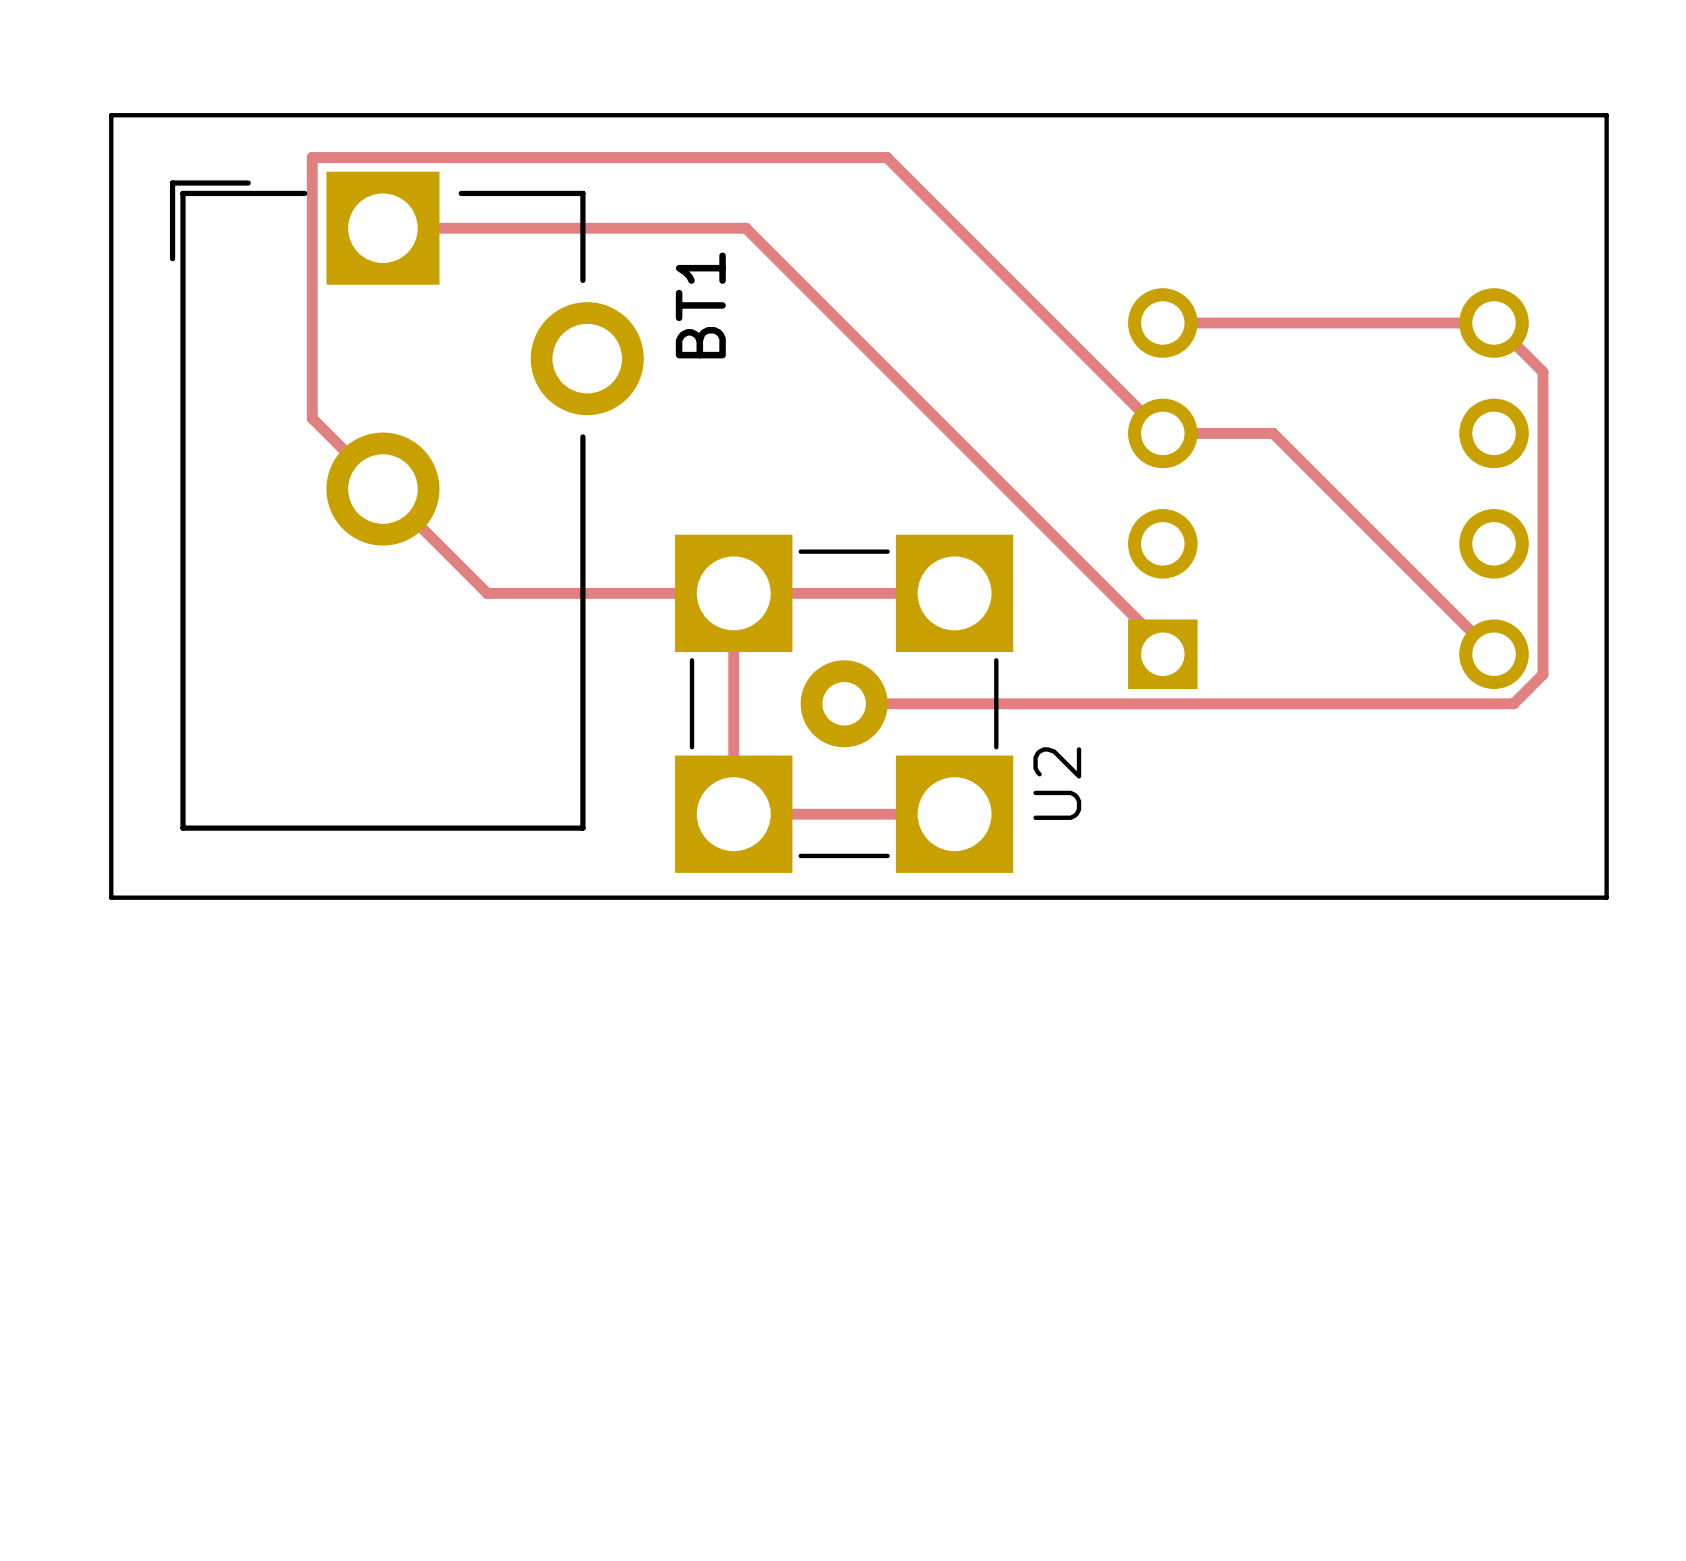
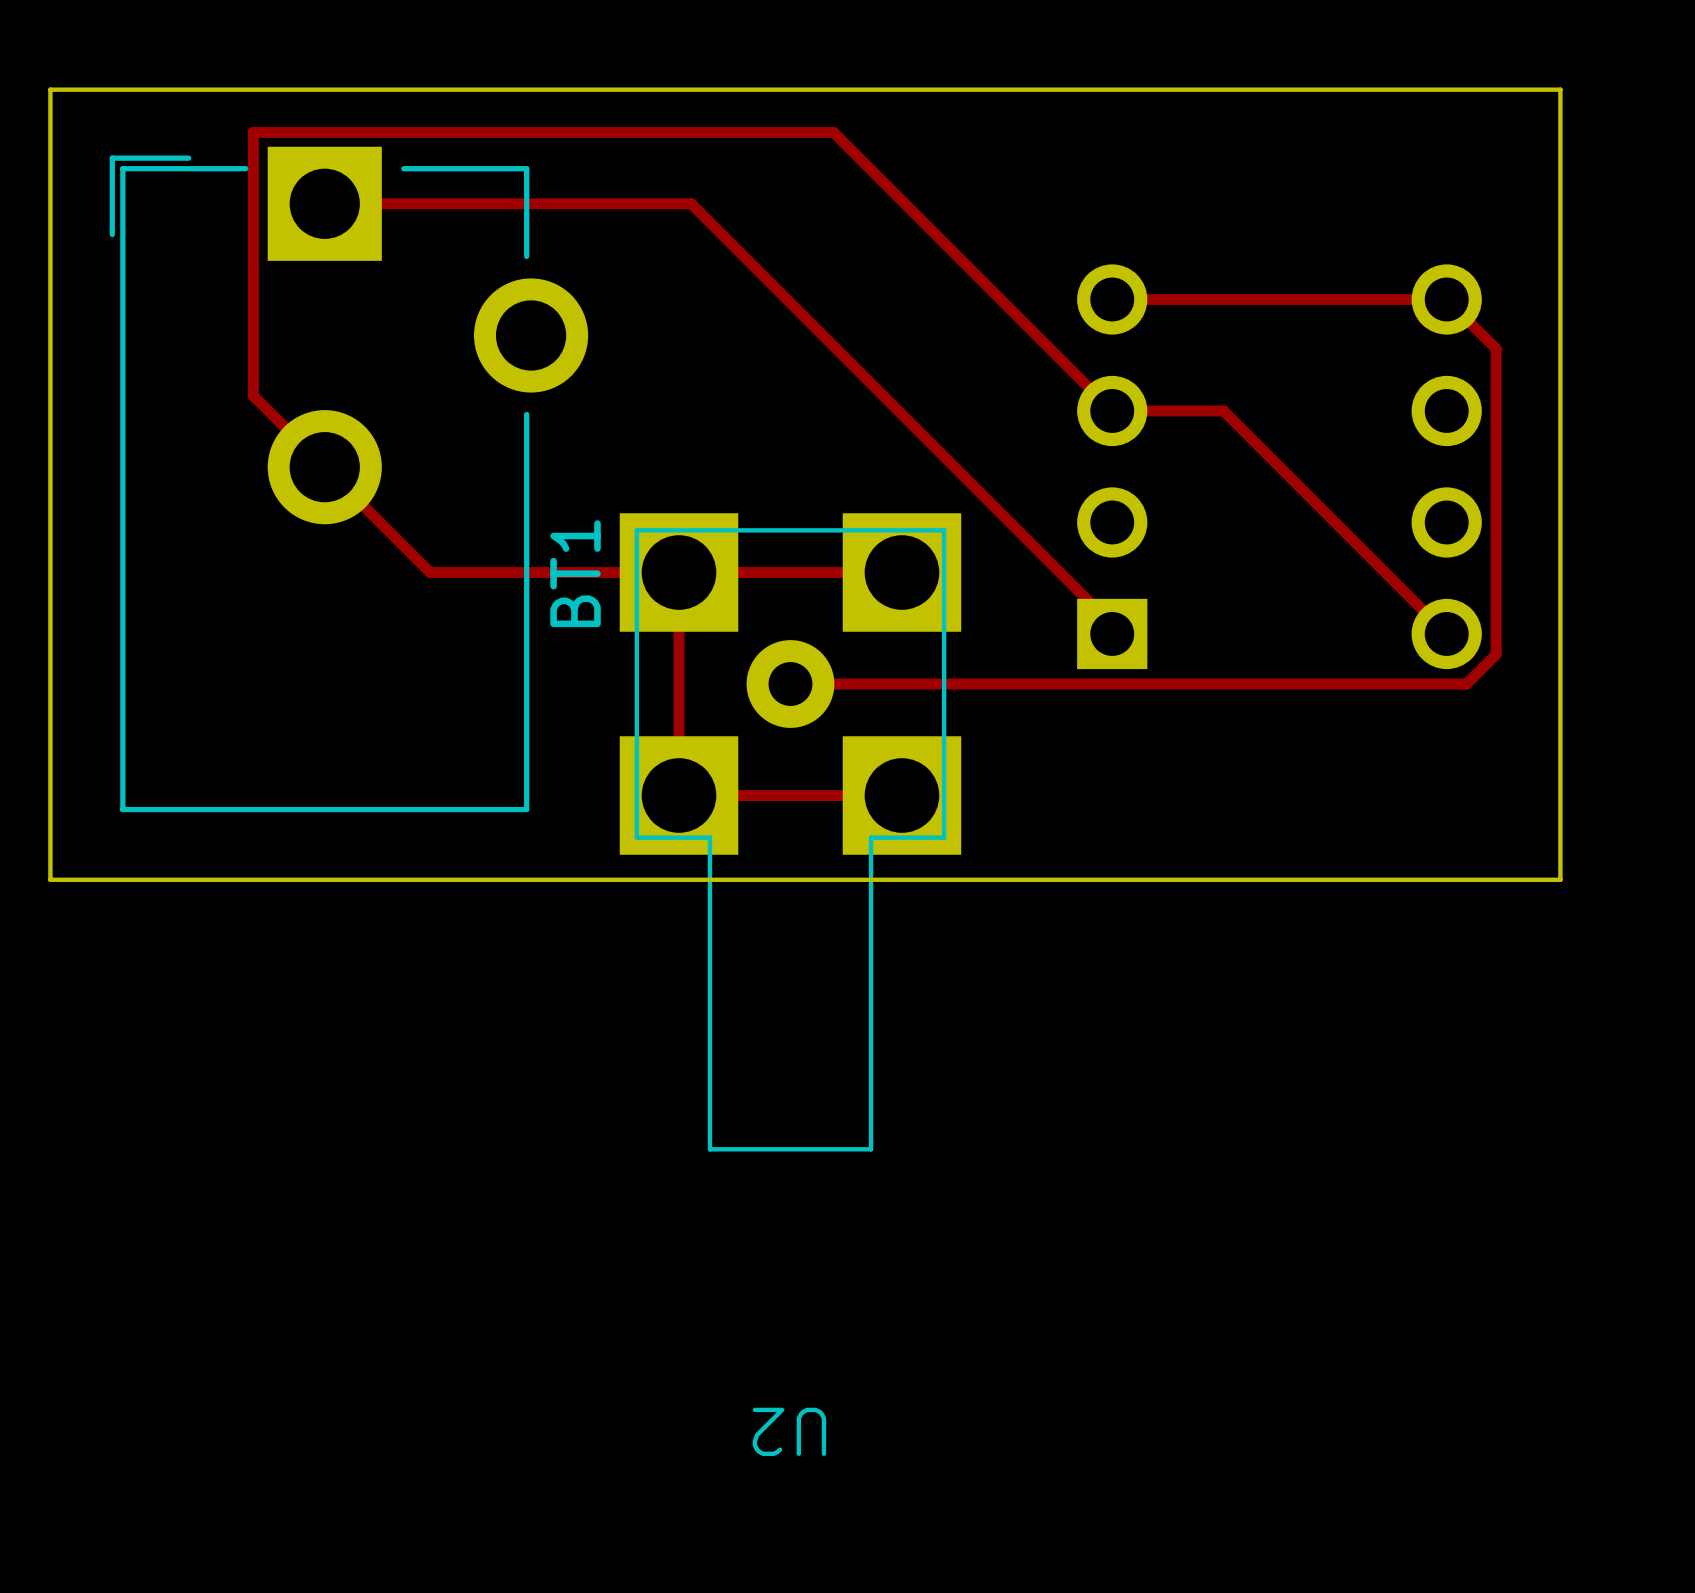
BT1 name position: BT1 (700, 305) -> BT1 (575, 573)
U2 footprint: [675, 534, 1014, 873] -> [619, 513, 962, 1152]
U2 name position: U2 (1057, 783) -> U2 (789, 1431)

